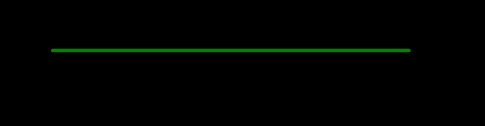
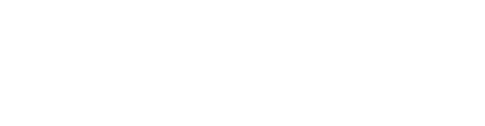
bottom track: (409, 50) (52, 50) -> none

